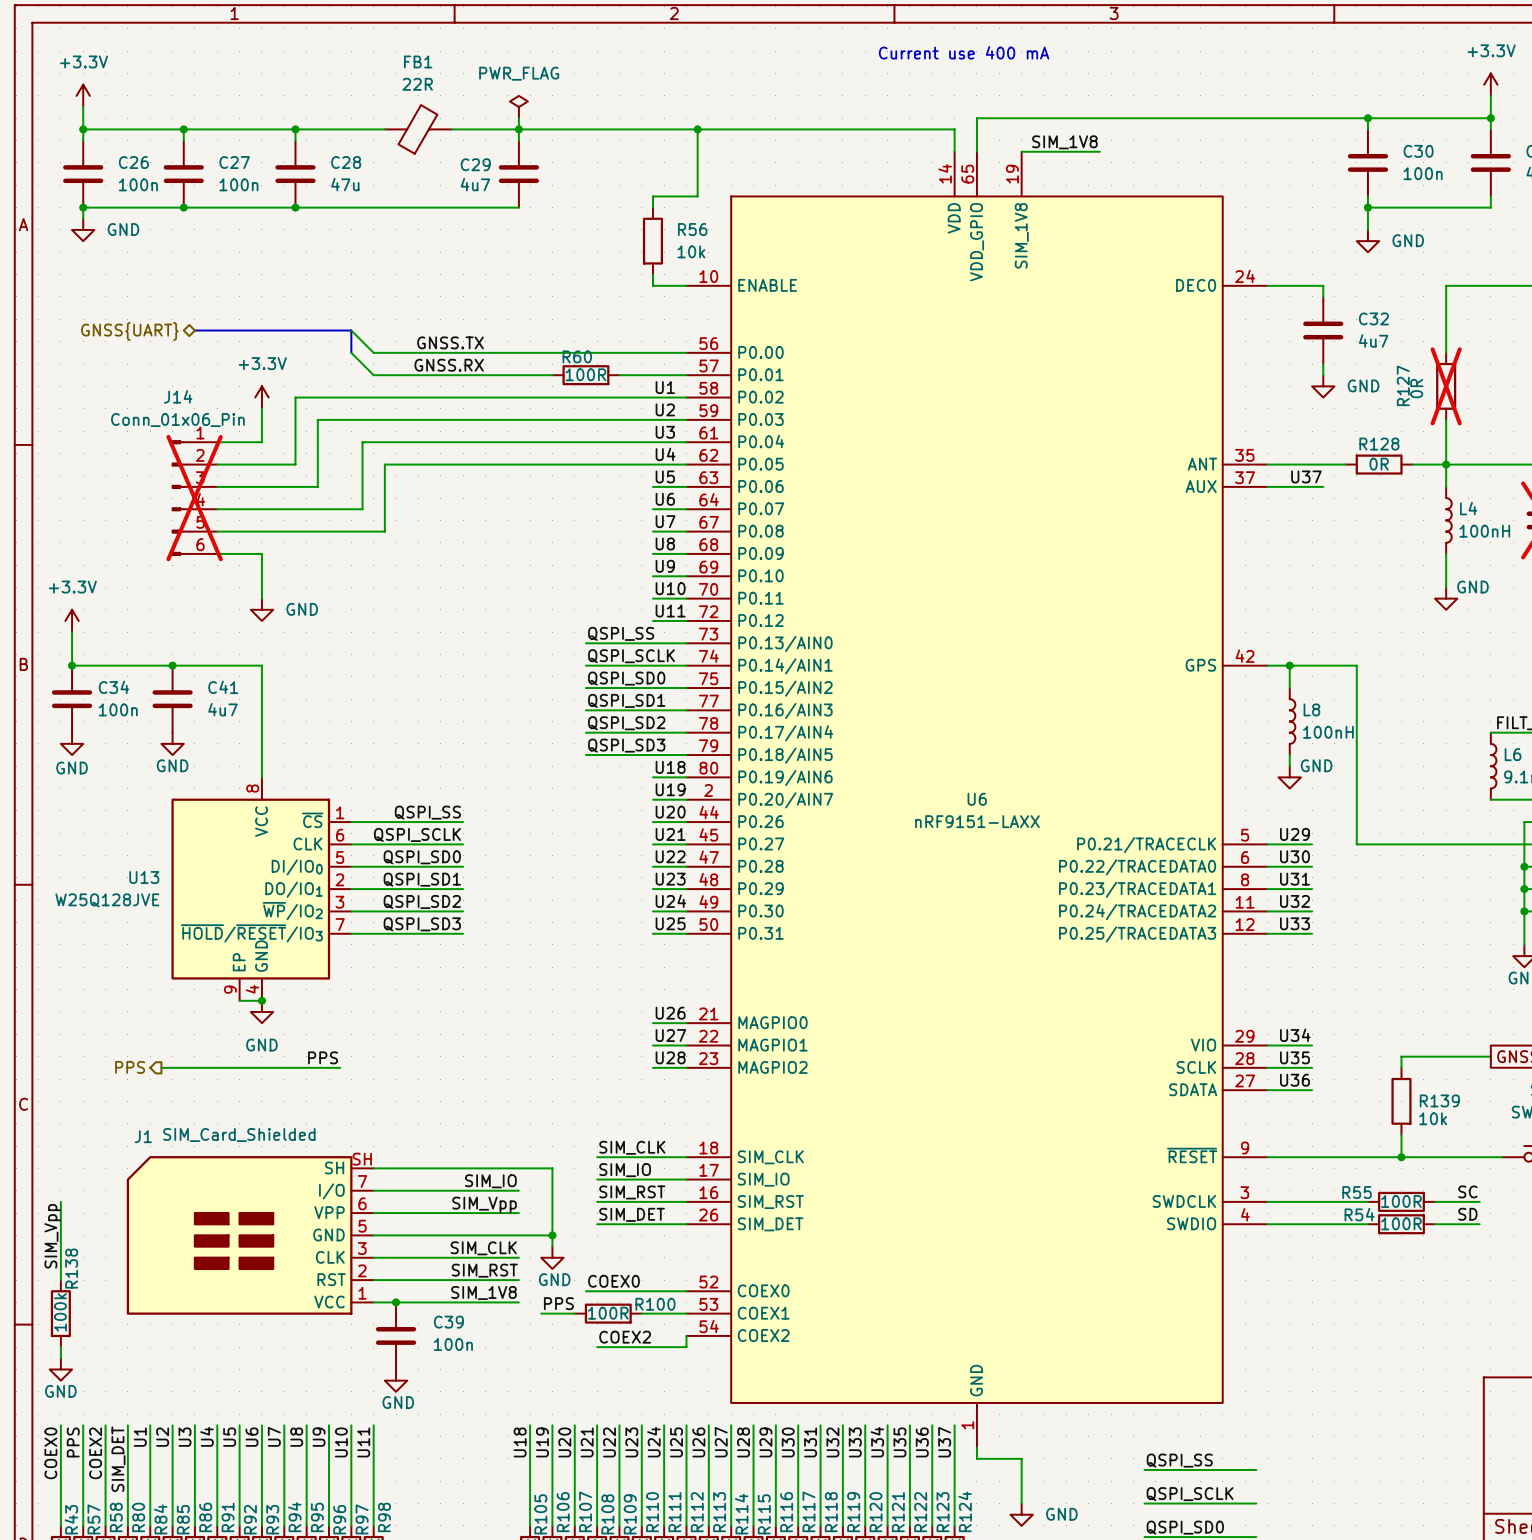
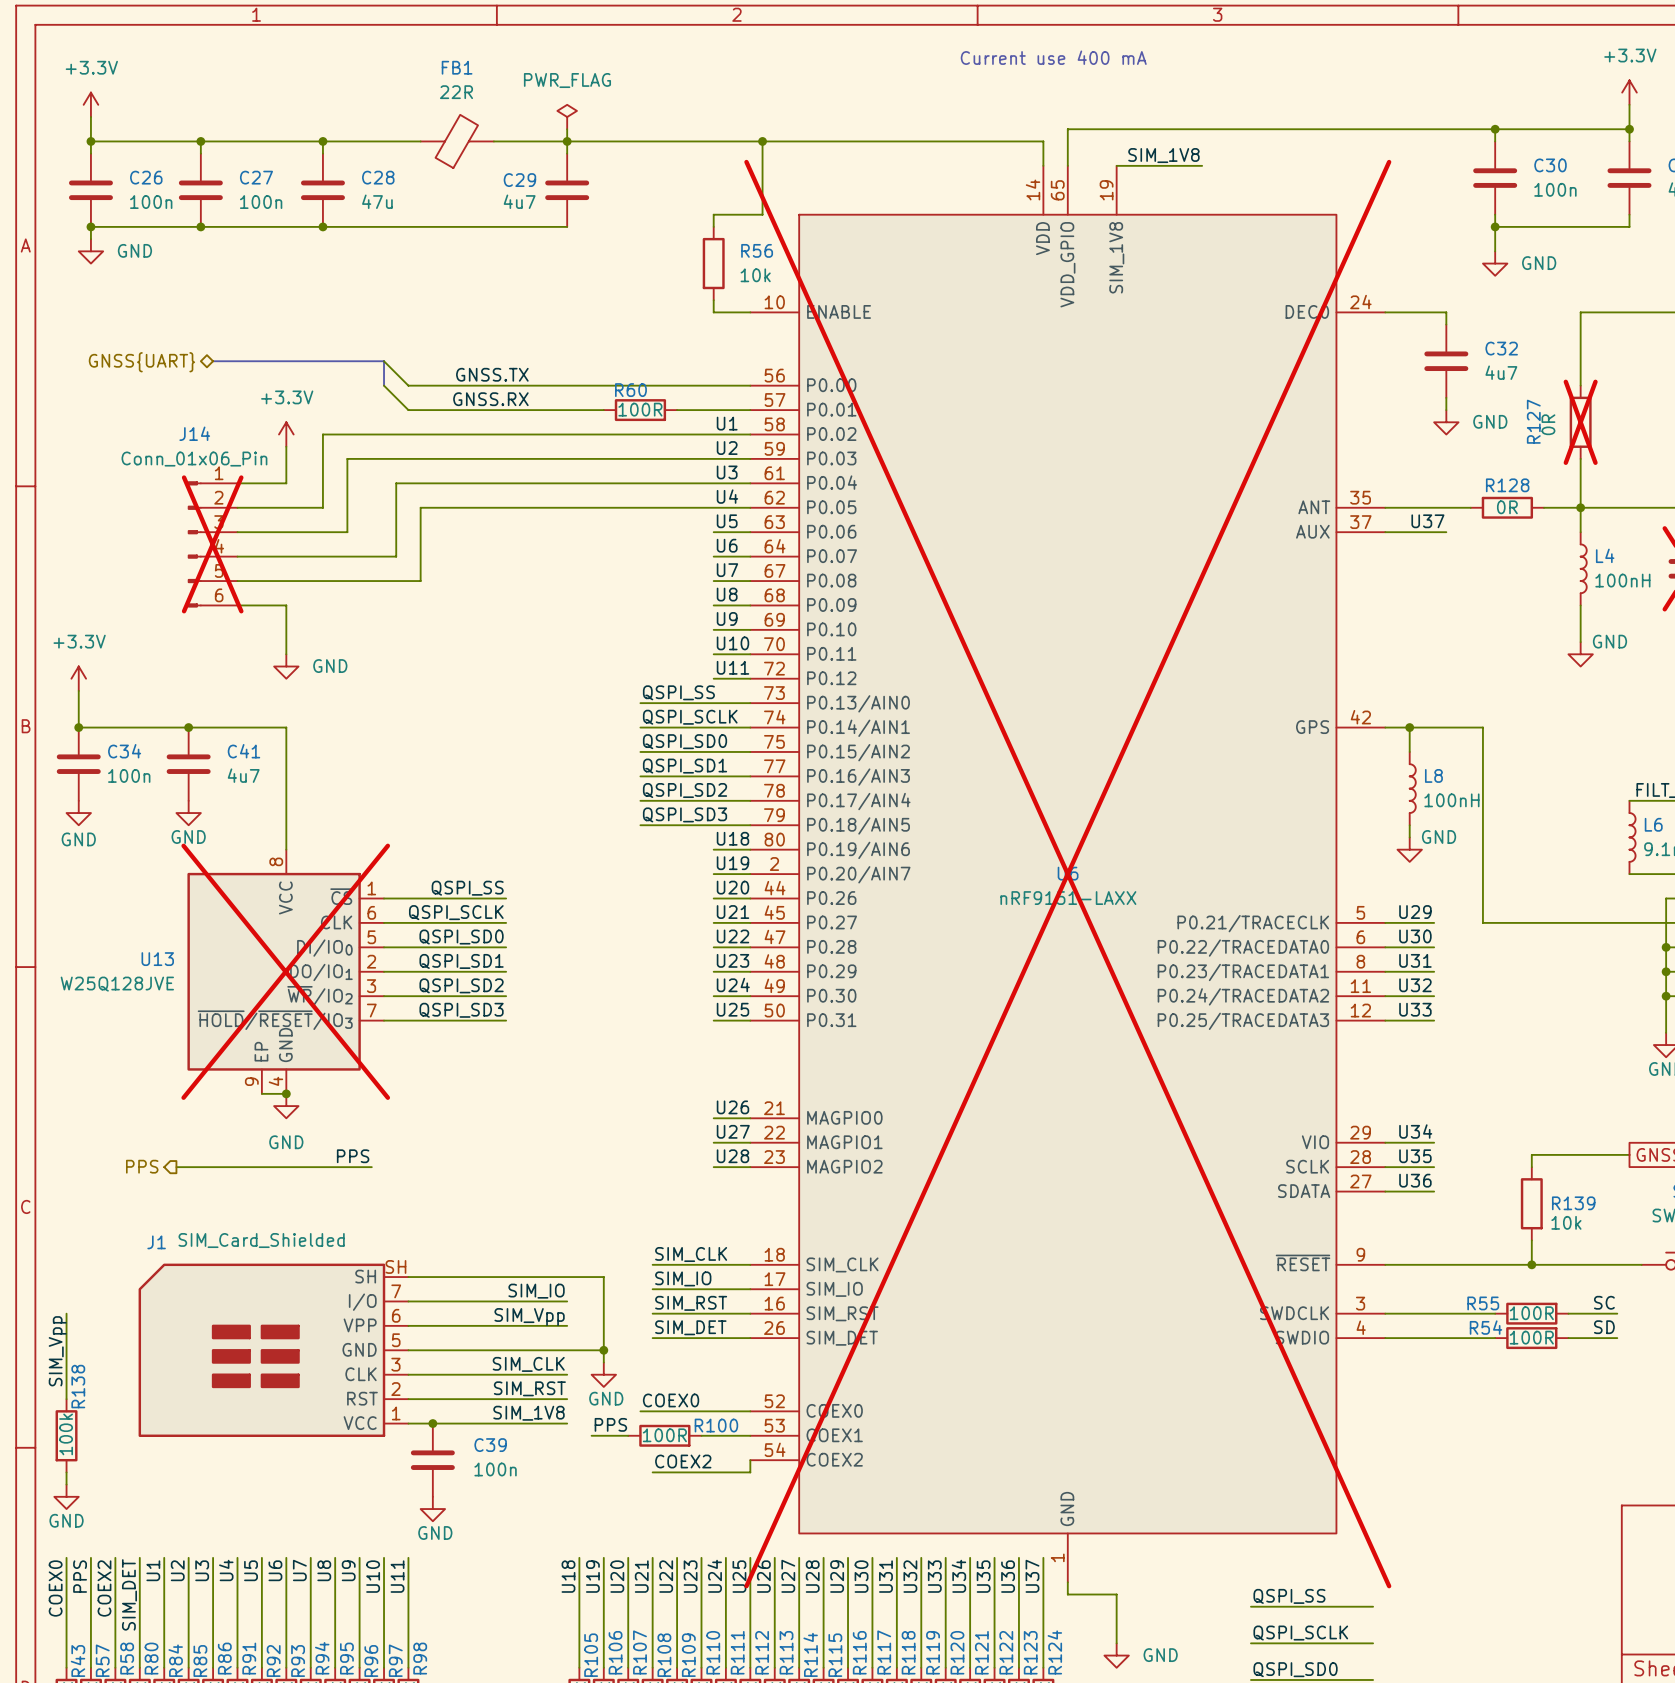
U6 do-not-place cross: none -> (1067, 874)
U13 do-not-place cross: none -> (285, 971)

